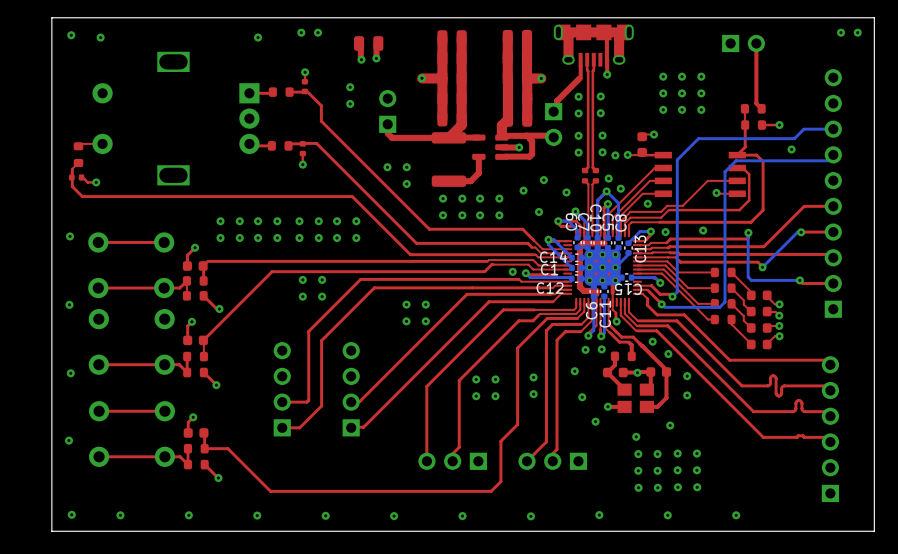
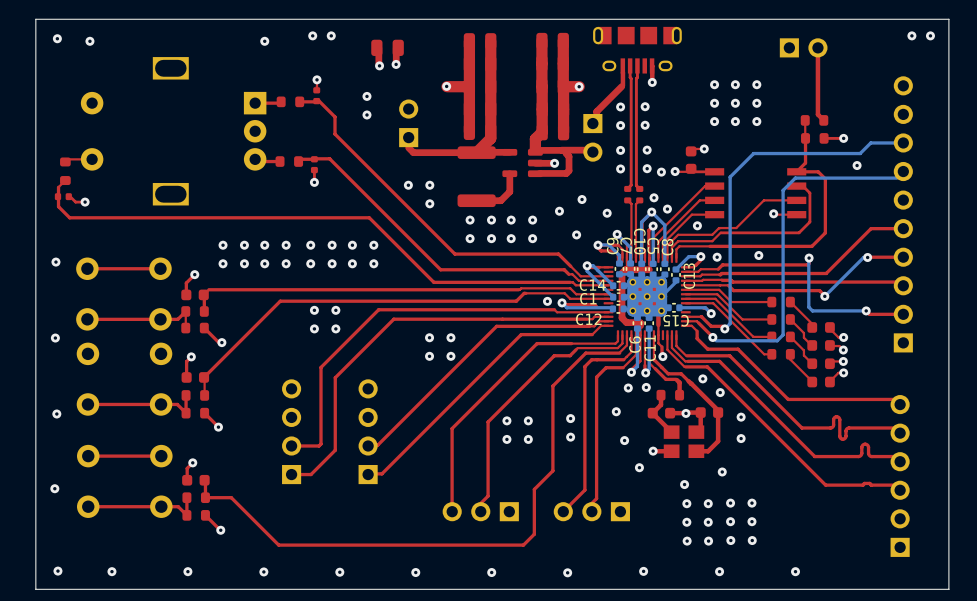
top track: (603, 32) (606, 35) (606, 59) -> none
top track: (619, 59) (619, 36) (623, 32) (564, 32) (568, 36) (568, 59) -> none

